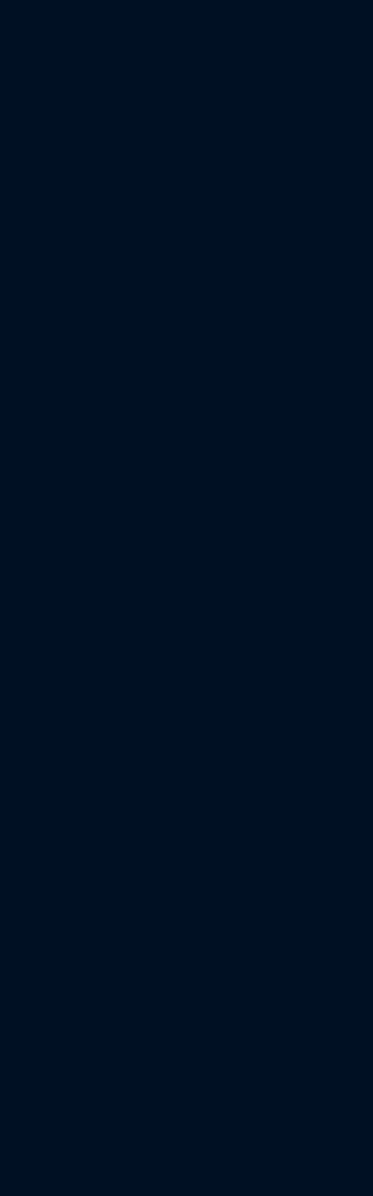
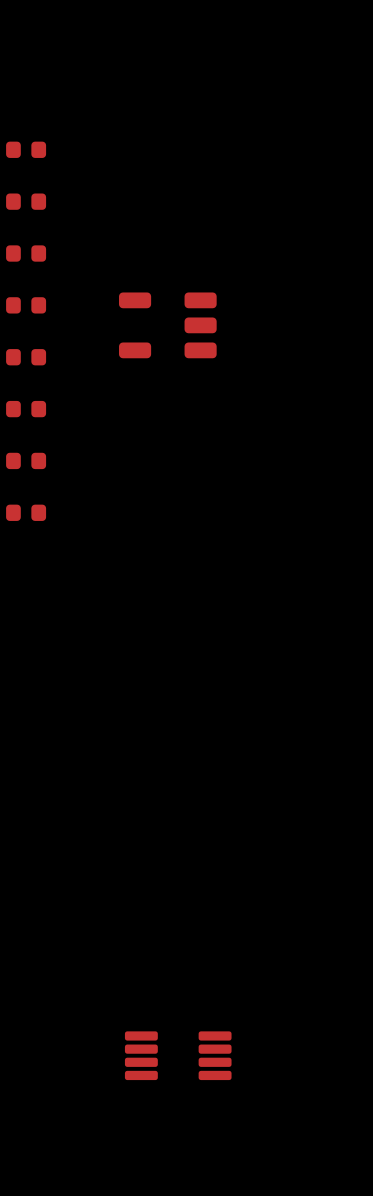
part: none -> (26, 149)
part: none -> (26, 201)
part: none -> (26, 253)
part: none -> (26, 305)
part: none -> (167, 325)
part: none -> (26, 357)
part: none -> (26, 409)
part: none -> (26, 460)
part: none -> (26, 512)
part: none -> (178, 1055)

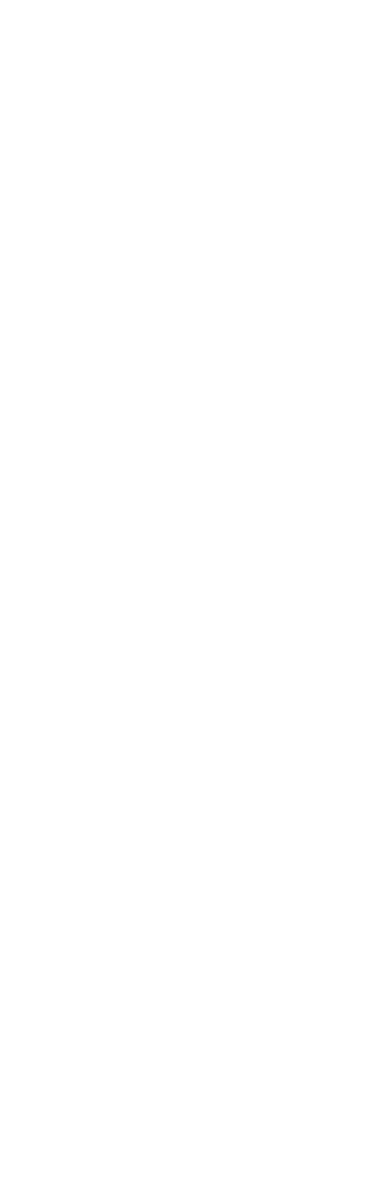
part: (26, 149) -> none
part: (26, 201) -> none
part: (26, 253) -> none
part: (26, 305) -> none
part: (167, 325) -> none
part: (26, 357) -> none
part: (26, 409) -> none
part: (26, 460) -> none
part: (26, 512) -> none
part: (178, 1055) -> none

